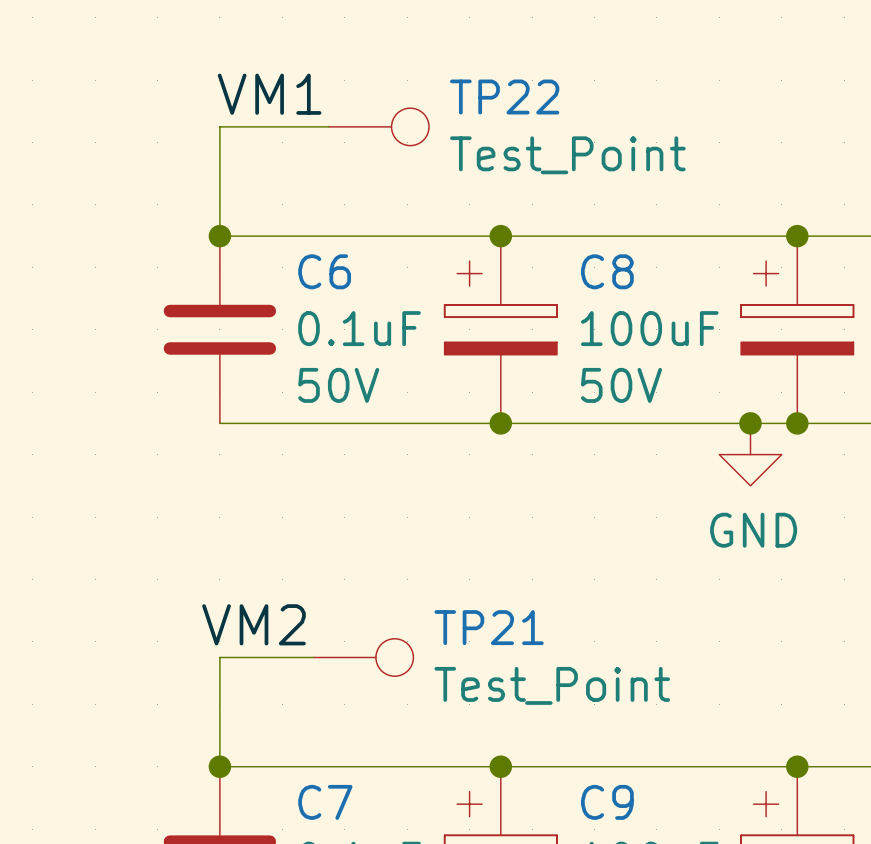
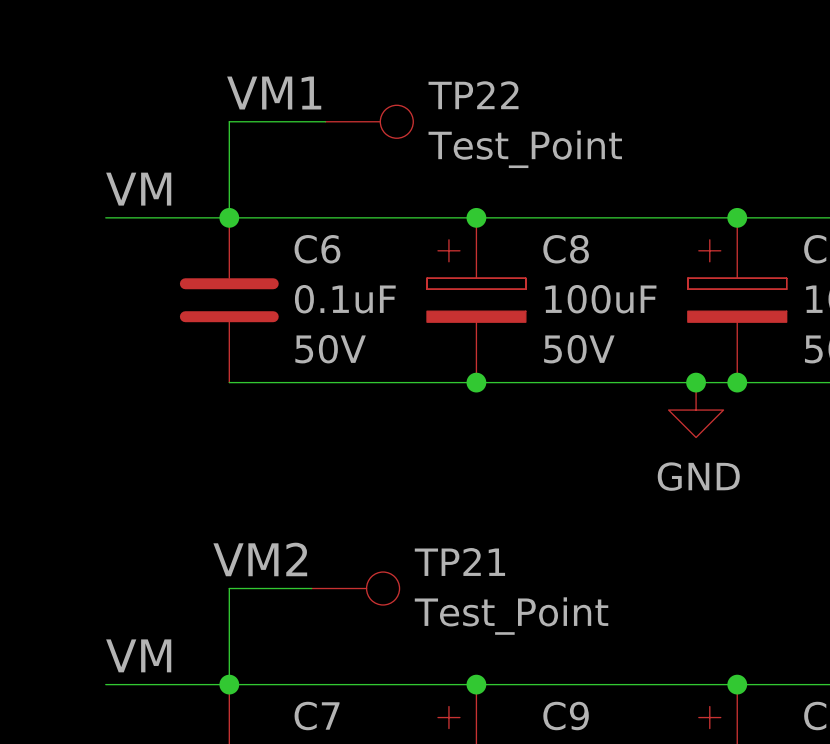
label: none -> VM (138, 189)
wire: none -> (105, 217) (229, 217)
label: none -> VM (138, 655)
wire: none -> (105, 684) (229, 684)

